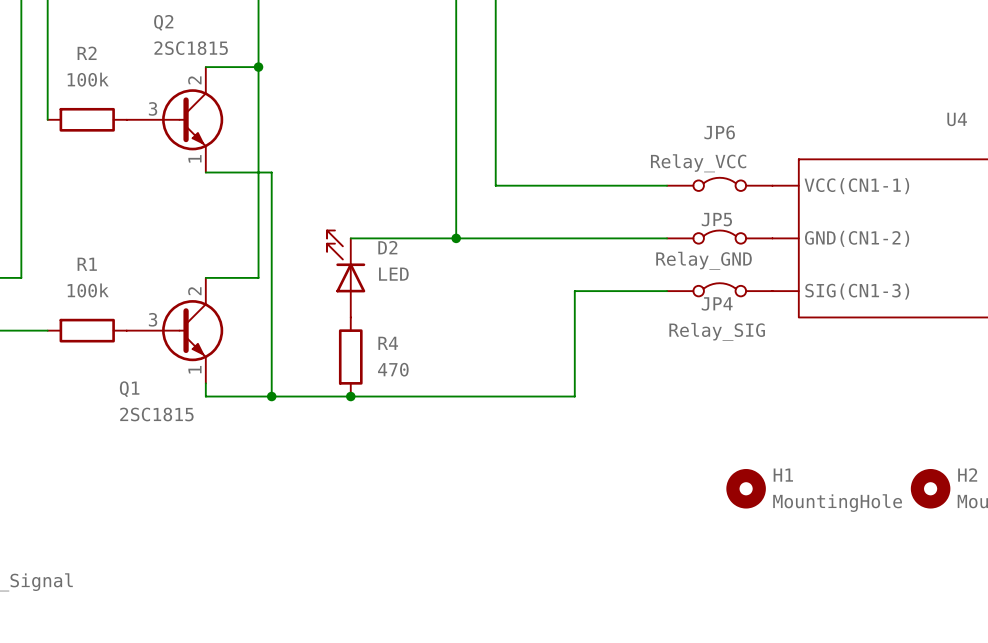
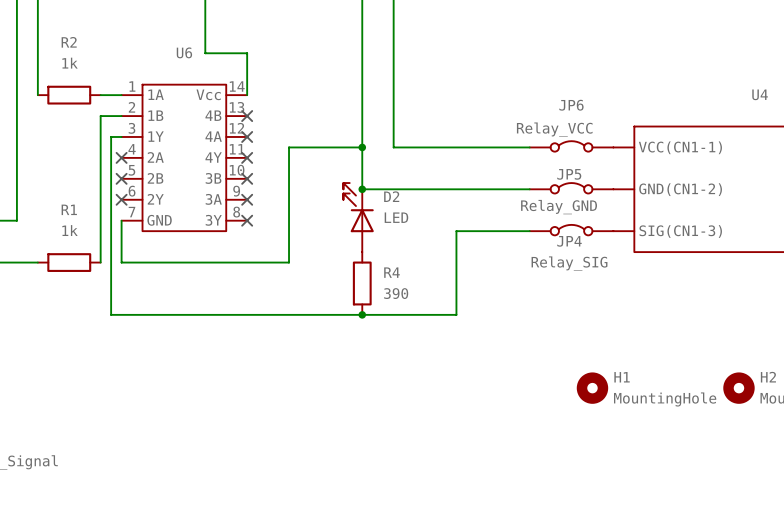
wire: (205, 67) (258, 67) (258, 277) (205, 277) -> none
wire: none -> (205, 53) (247, 53) (247, 95)
junction: (258, 67) -> none
R2 value: 100k (88, 79) -> 1k (70, 63)
Q2: 2SC1815 (174, 119) -> none
wire: none -> (121, 116) (100, 116) (100, 262)
no-connect mark: none -> (247, 116)
wire: (205, 172) (271, 172) (271, 396) -> none
no-connect mark: none -> (247, 136)
wire: none -> (362, 147) (289, 147) (289, 262) (121, 262) (121, 220)
junction: none -> (362, 147)
no-connect mark: none -> (121, 157)
U6: none -> (184, 157)
no-connect mark: none -> (247, 157)
no-connect mark: none -> (121, 178)
no-connect mark: none -> (247, 178)
wire: (350, 238) (456, 238) -> none
no-connect mark: none -> (121, 199)
no-connect mark: none -> (247, 199)
D2 position: (346, 273) -> (358, 217)
no-connect mark: none -> (247, 220)
R1 value: 100k (88, 290) -> 1k (70, 230)
Q1: 2SC1815 (174, 330) -> none
R4 position: (350, 356) -> (362, 283)
R4 value: 470 (393, 369) -> 390 (396, 293)
wire: (205, 383) (205, 396) -> (121, 136) (111, 136) (111, 314) (163, 314)
junction: (271, 396) -> none
junction: (350, 396) -> none
junction: none -> (362, 314)

